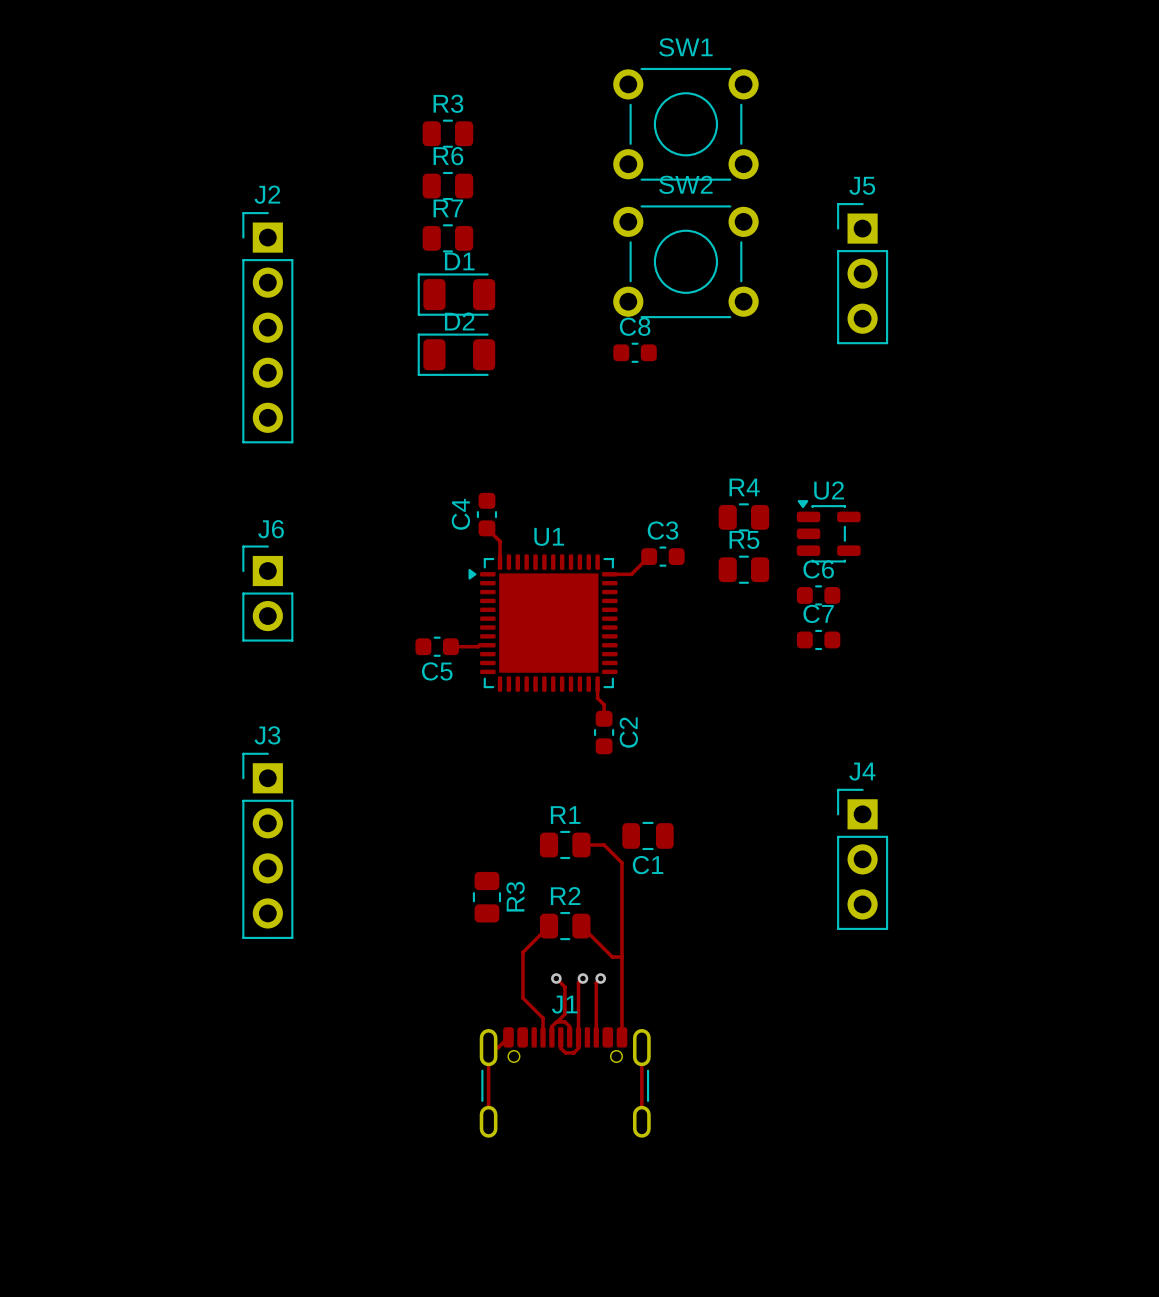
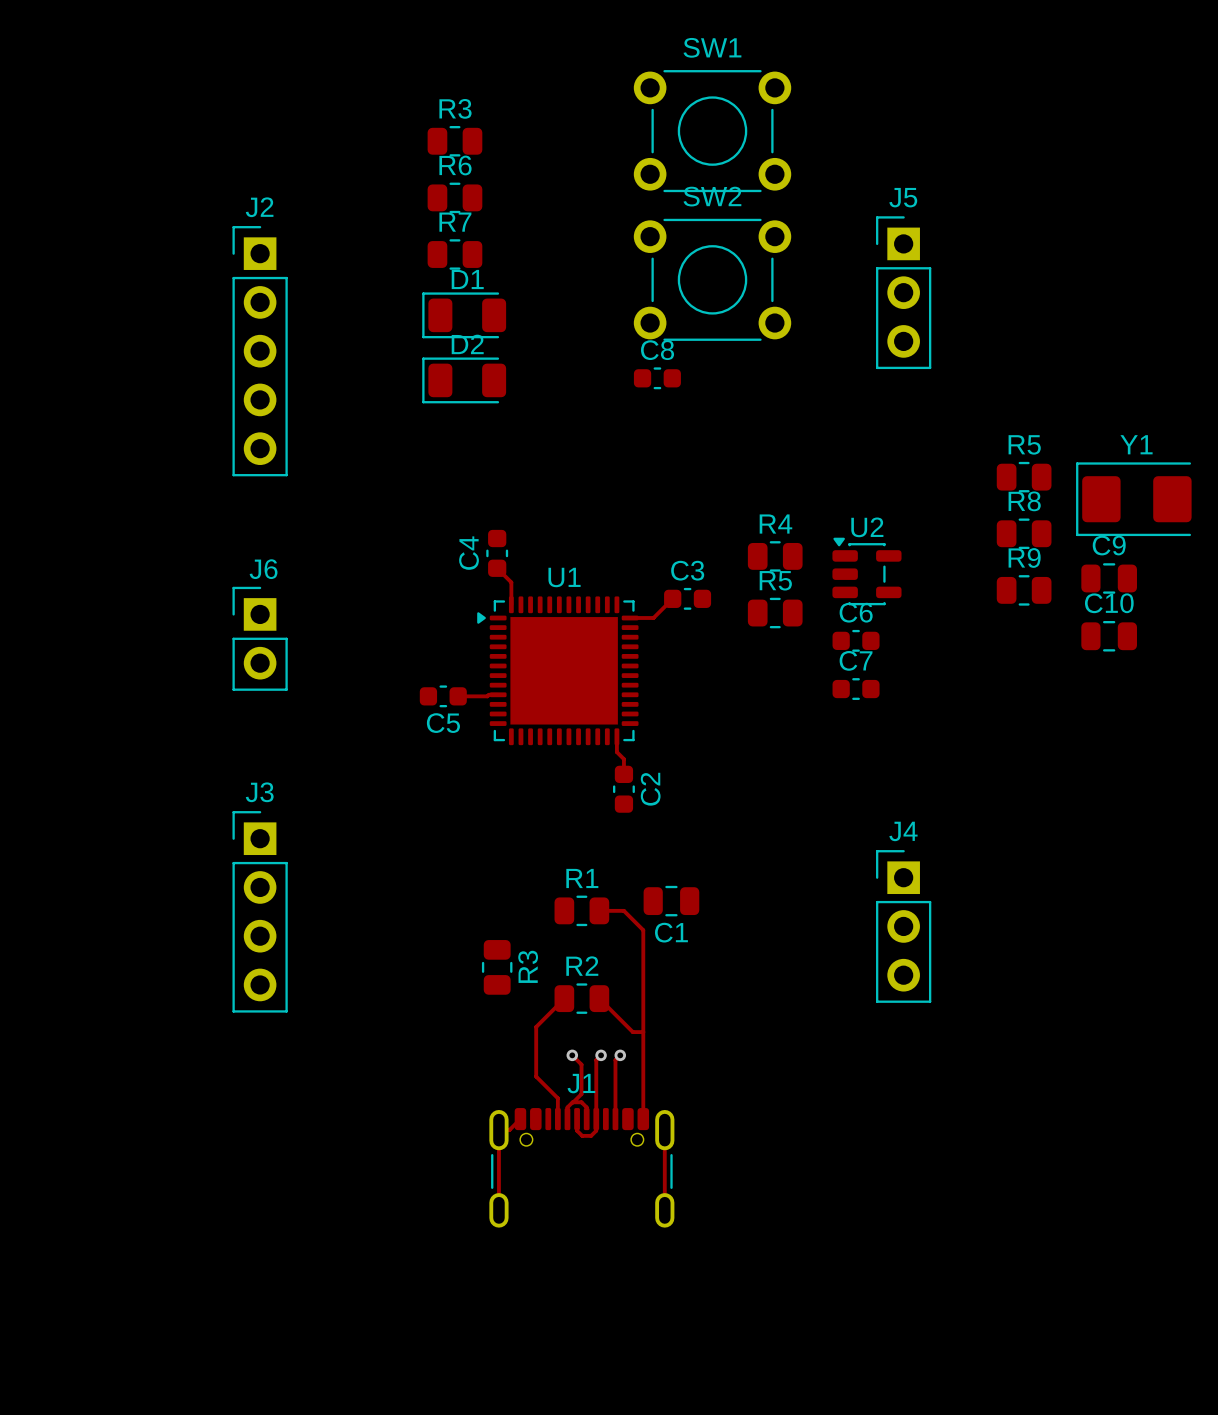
R5: none -> (1024, 477)
Y1: none -> (1133, 499)
R8: none -> (1024, 533)
C9: none -> (1109, 578)
R9: none -> (1024, 590)
C10: none -> (1109, 636)

